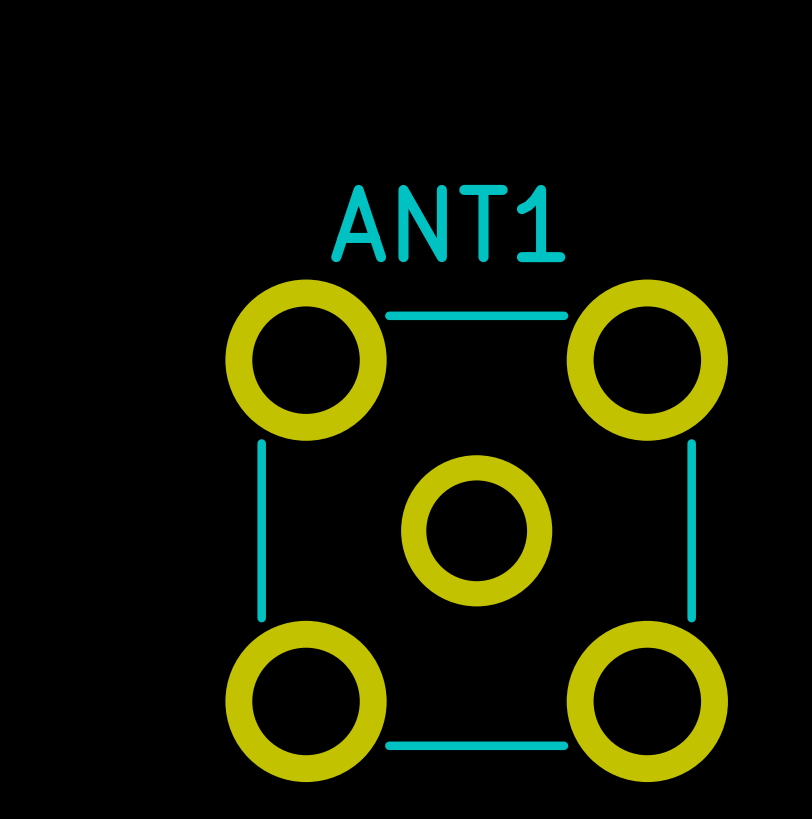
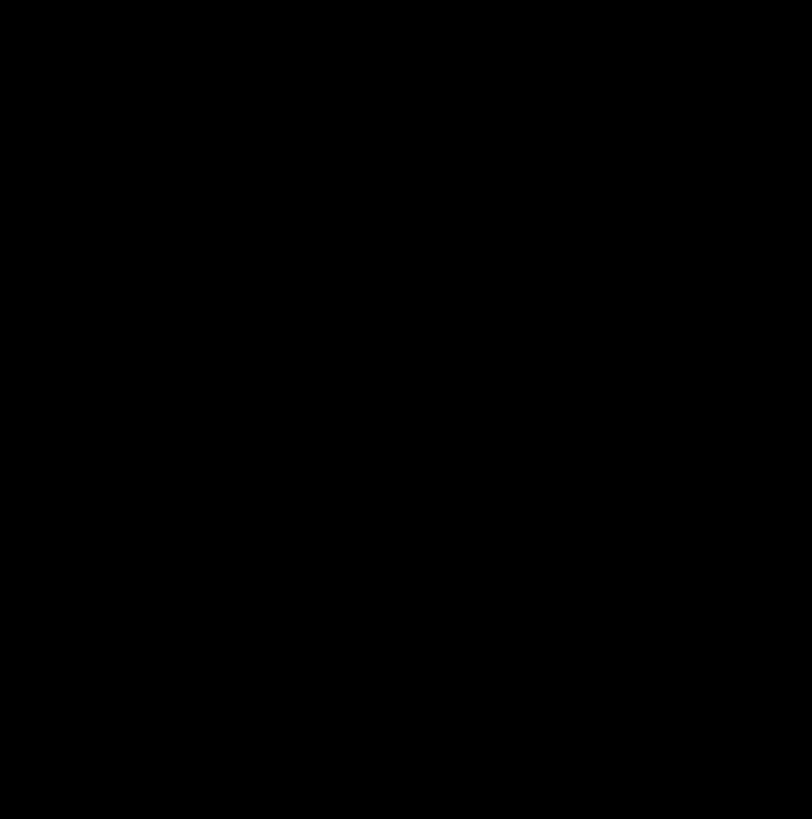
ANT1: (476, 530) -> none

